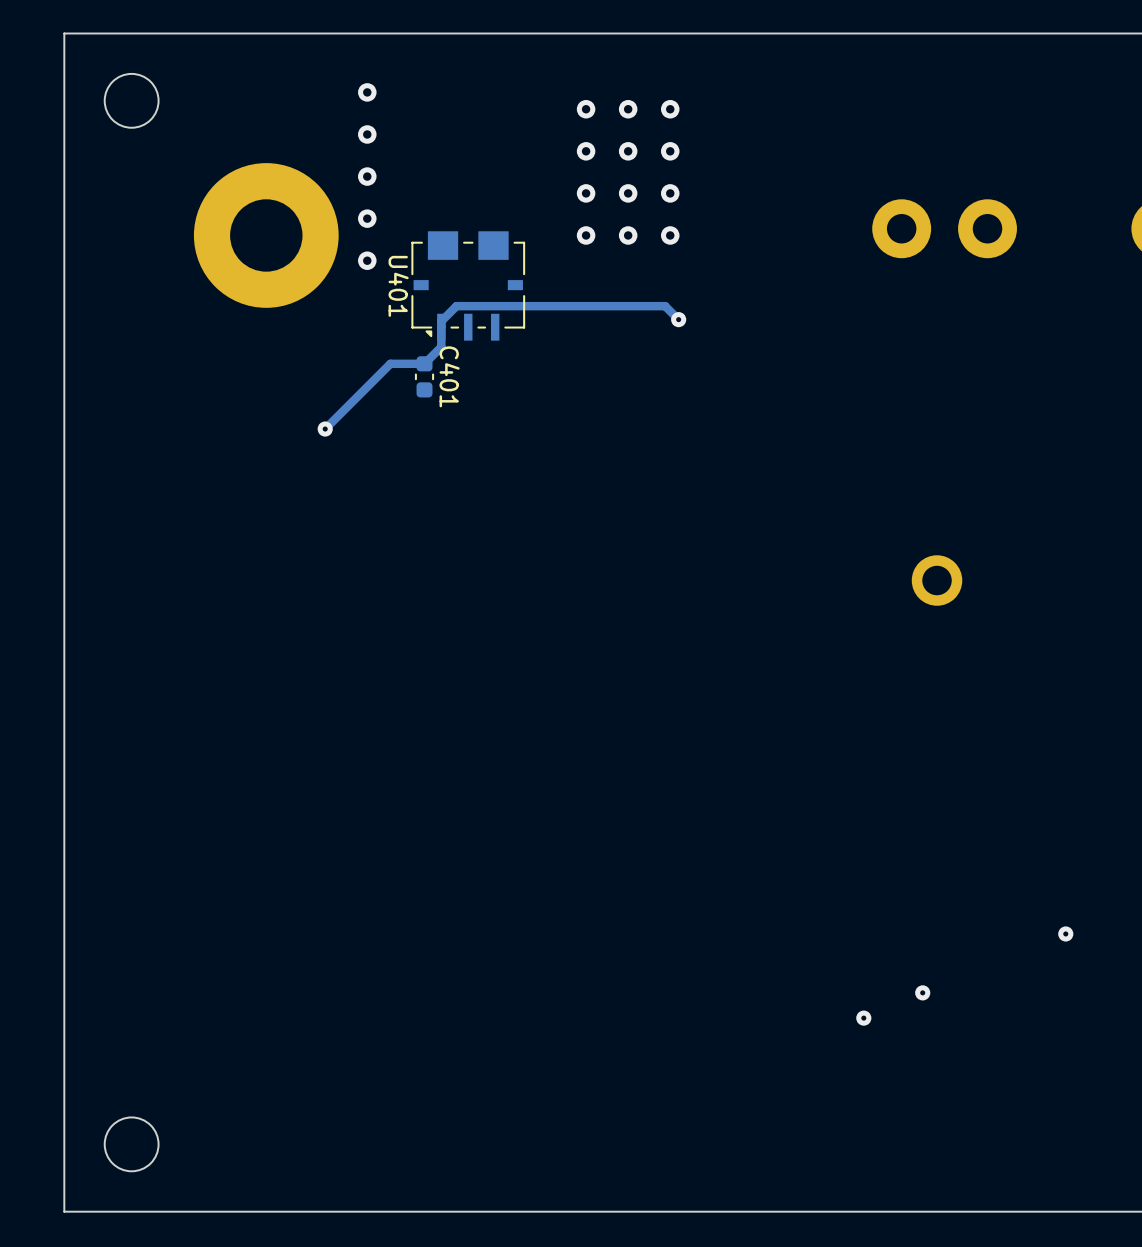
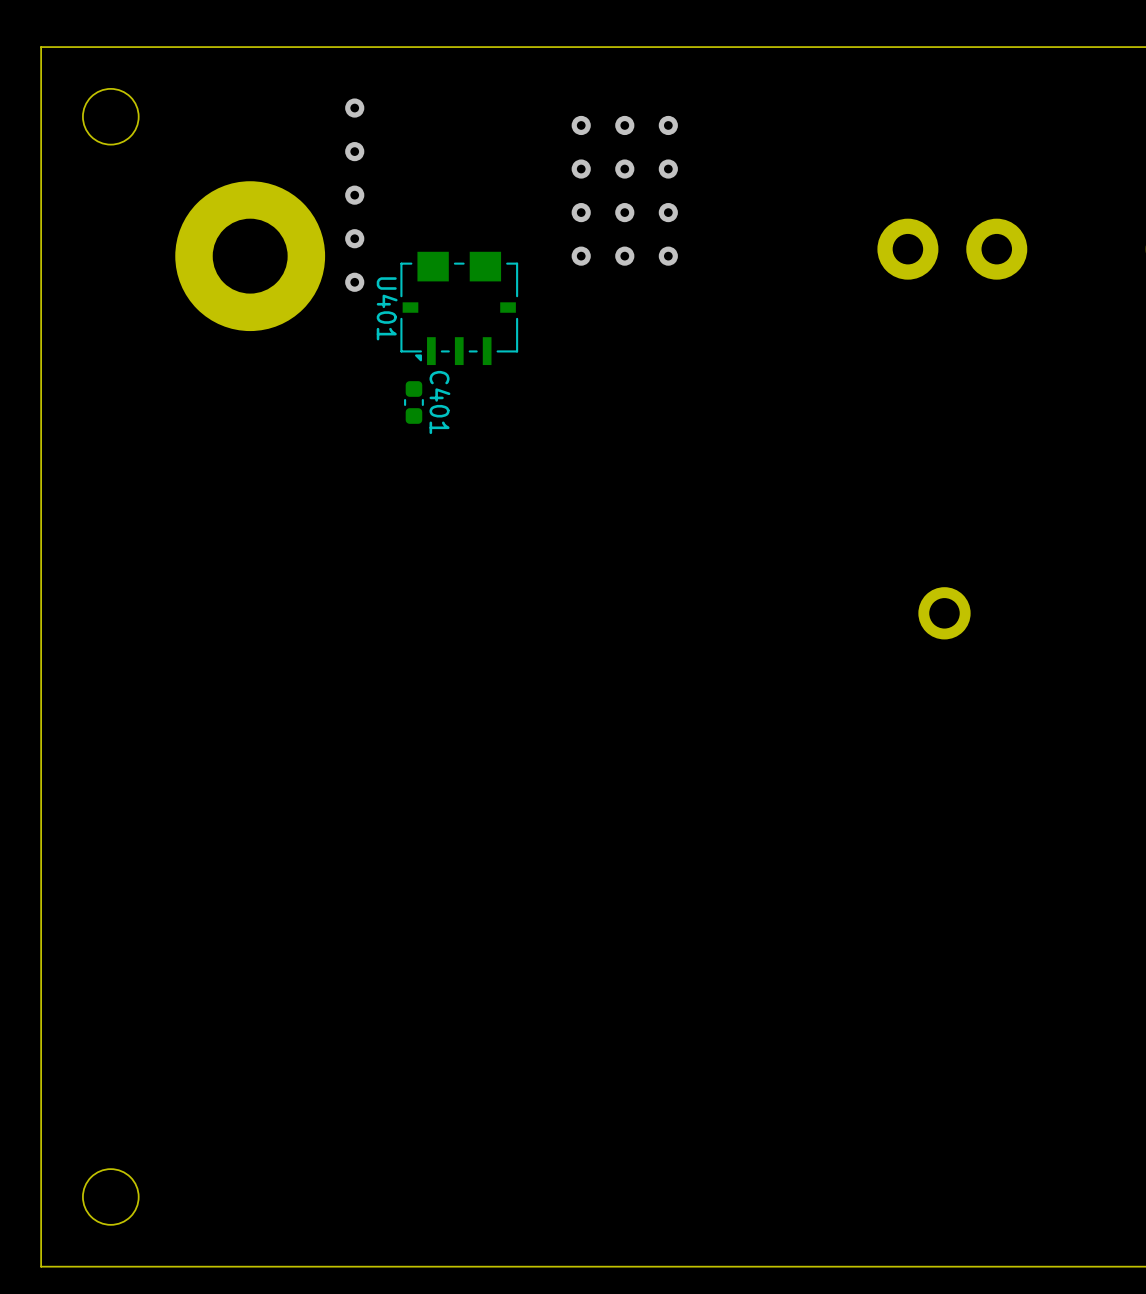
track: (678, 319) (665, 306) (456, 306) (441, 321) (441, 346) (424, 363) (390, 363) (325, 429) -> none
via: (678, 319) -> none
via: (325, 429) -> none
via: (1065, 933) -> none
via: (922, 992) -> none
via: (863, 1018) -> none

